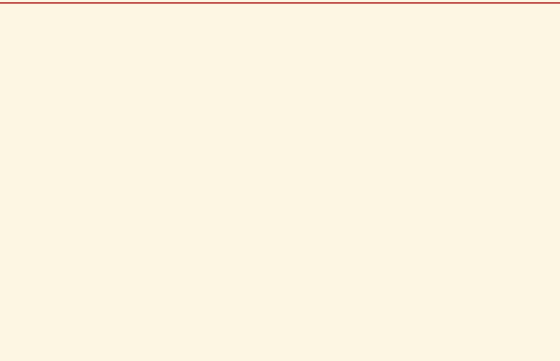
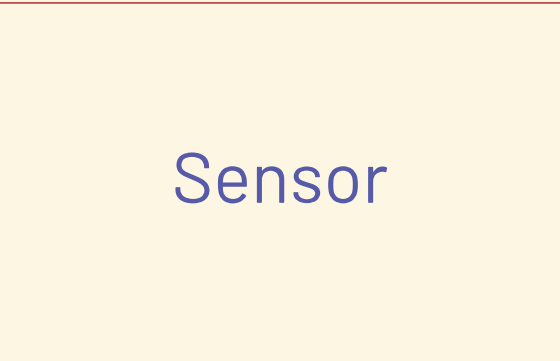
text: none -> Sensor (281, 177)

